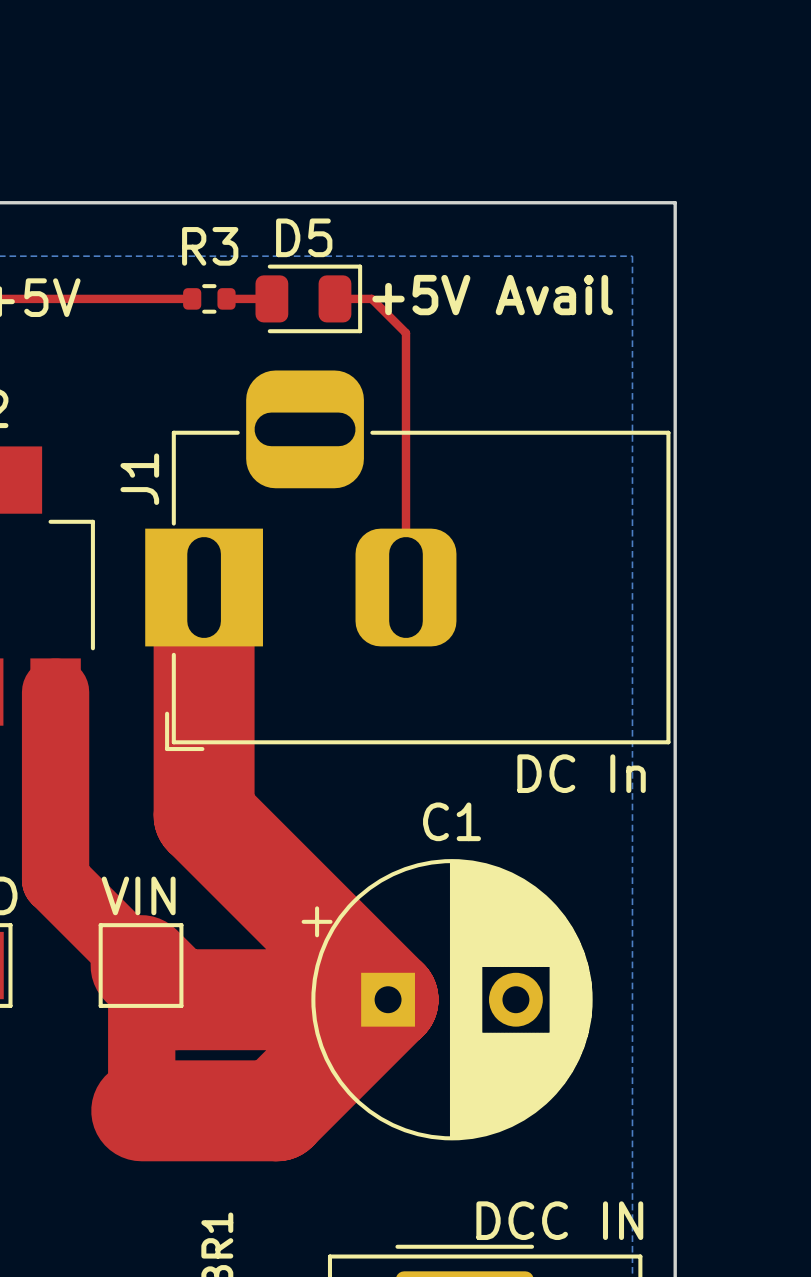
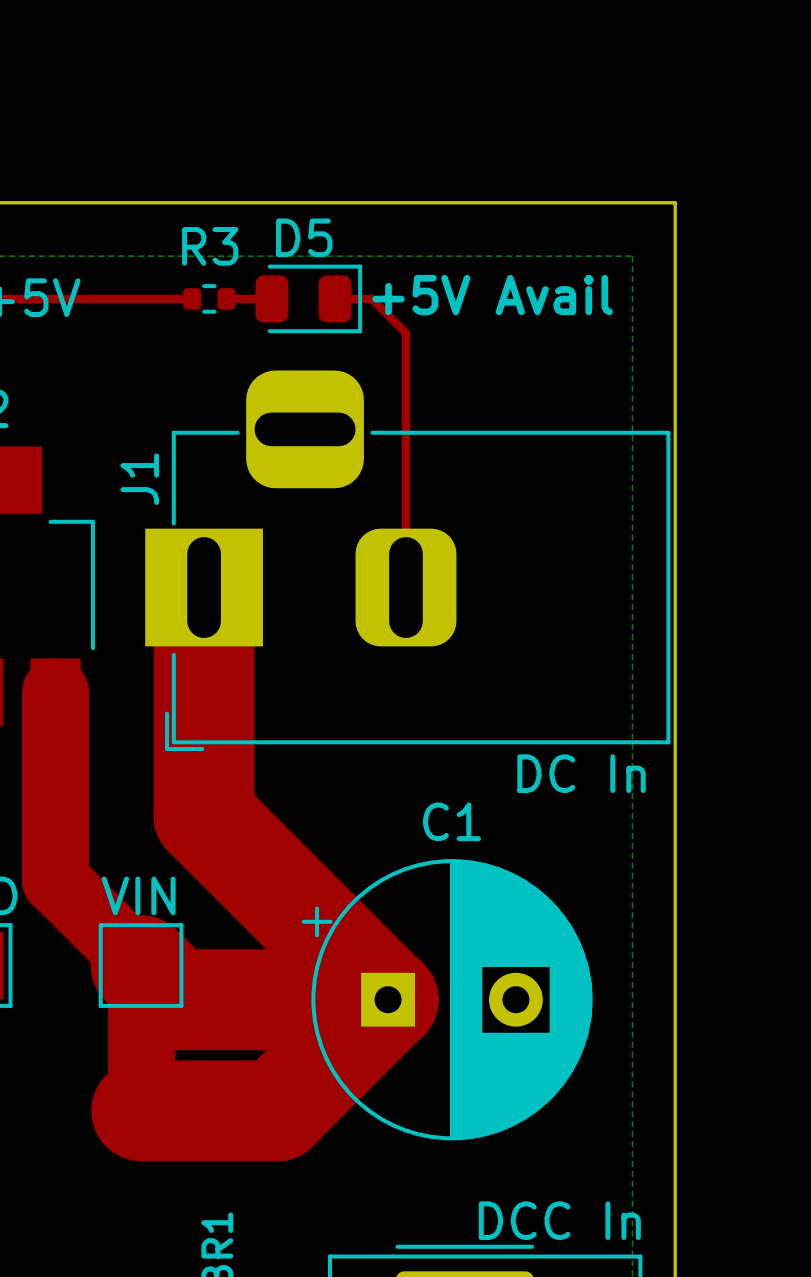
part value: DCC IN (559, 1220) -> DCC In (559, 1220)

